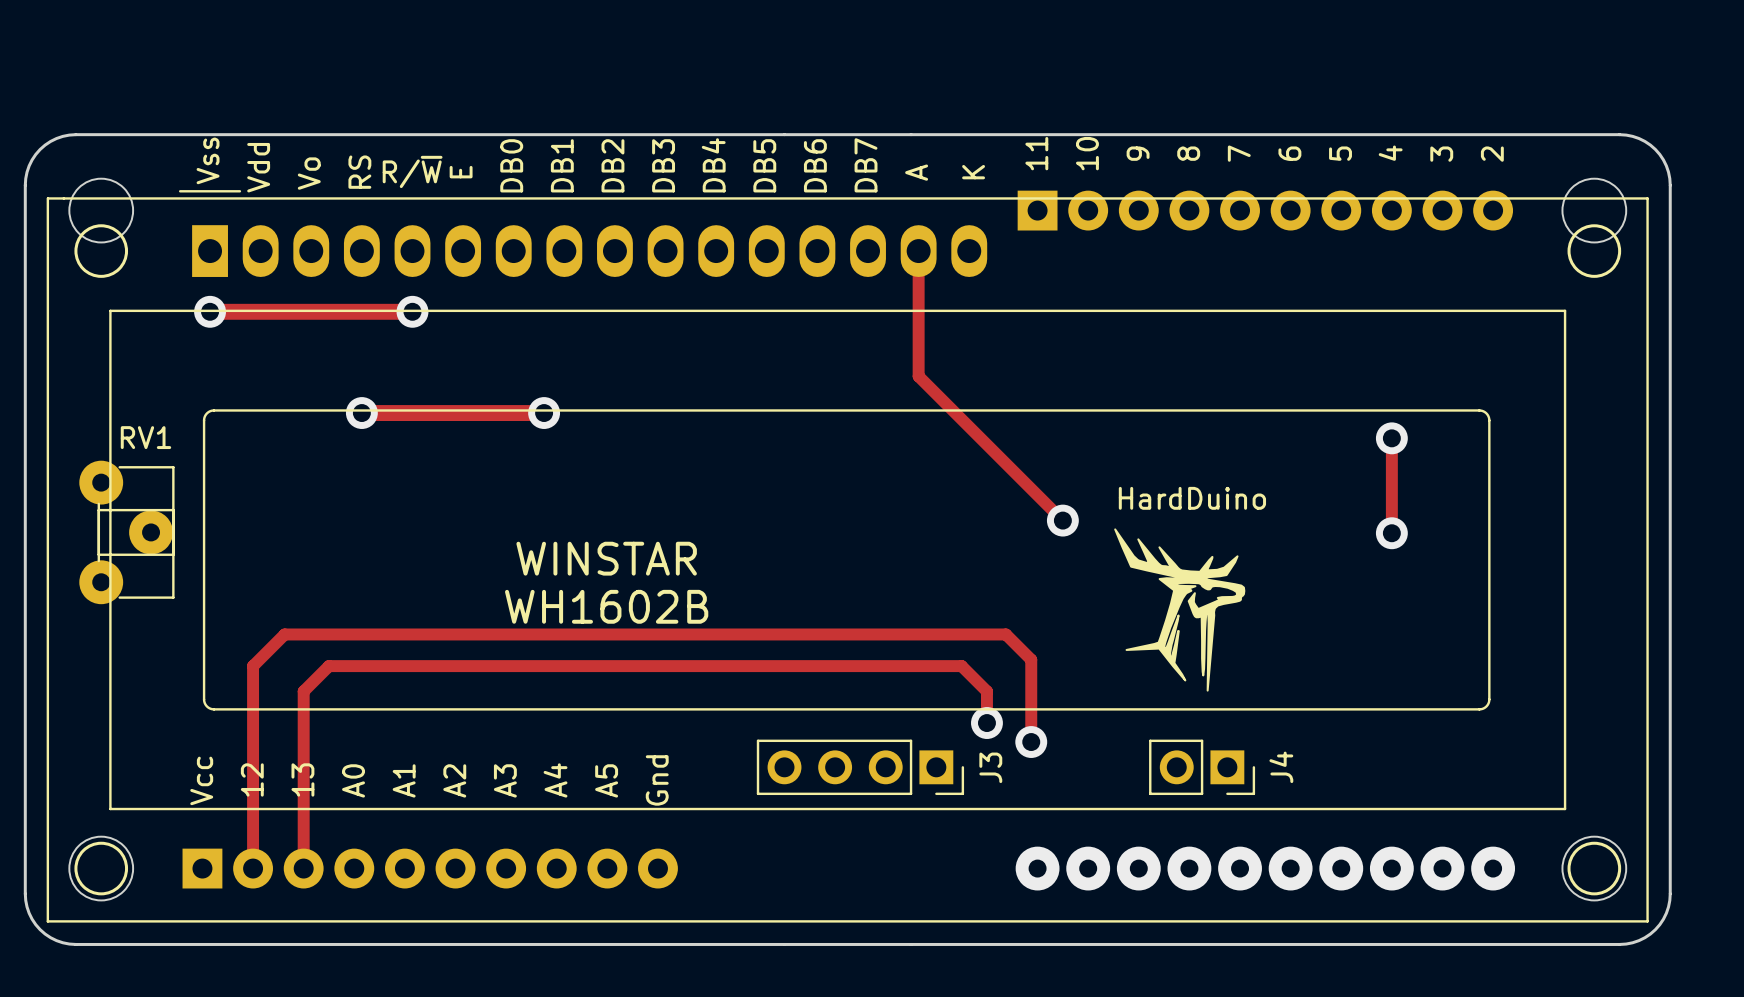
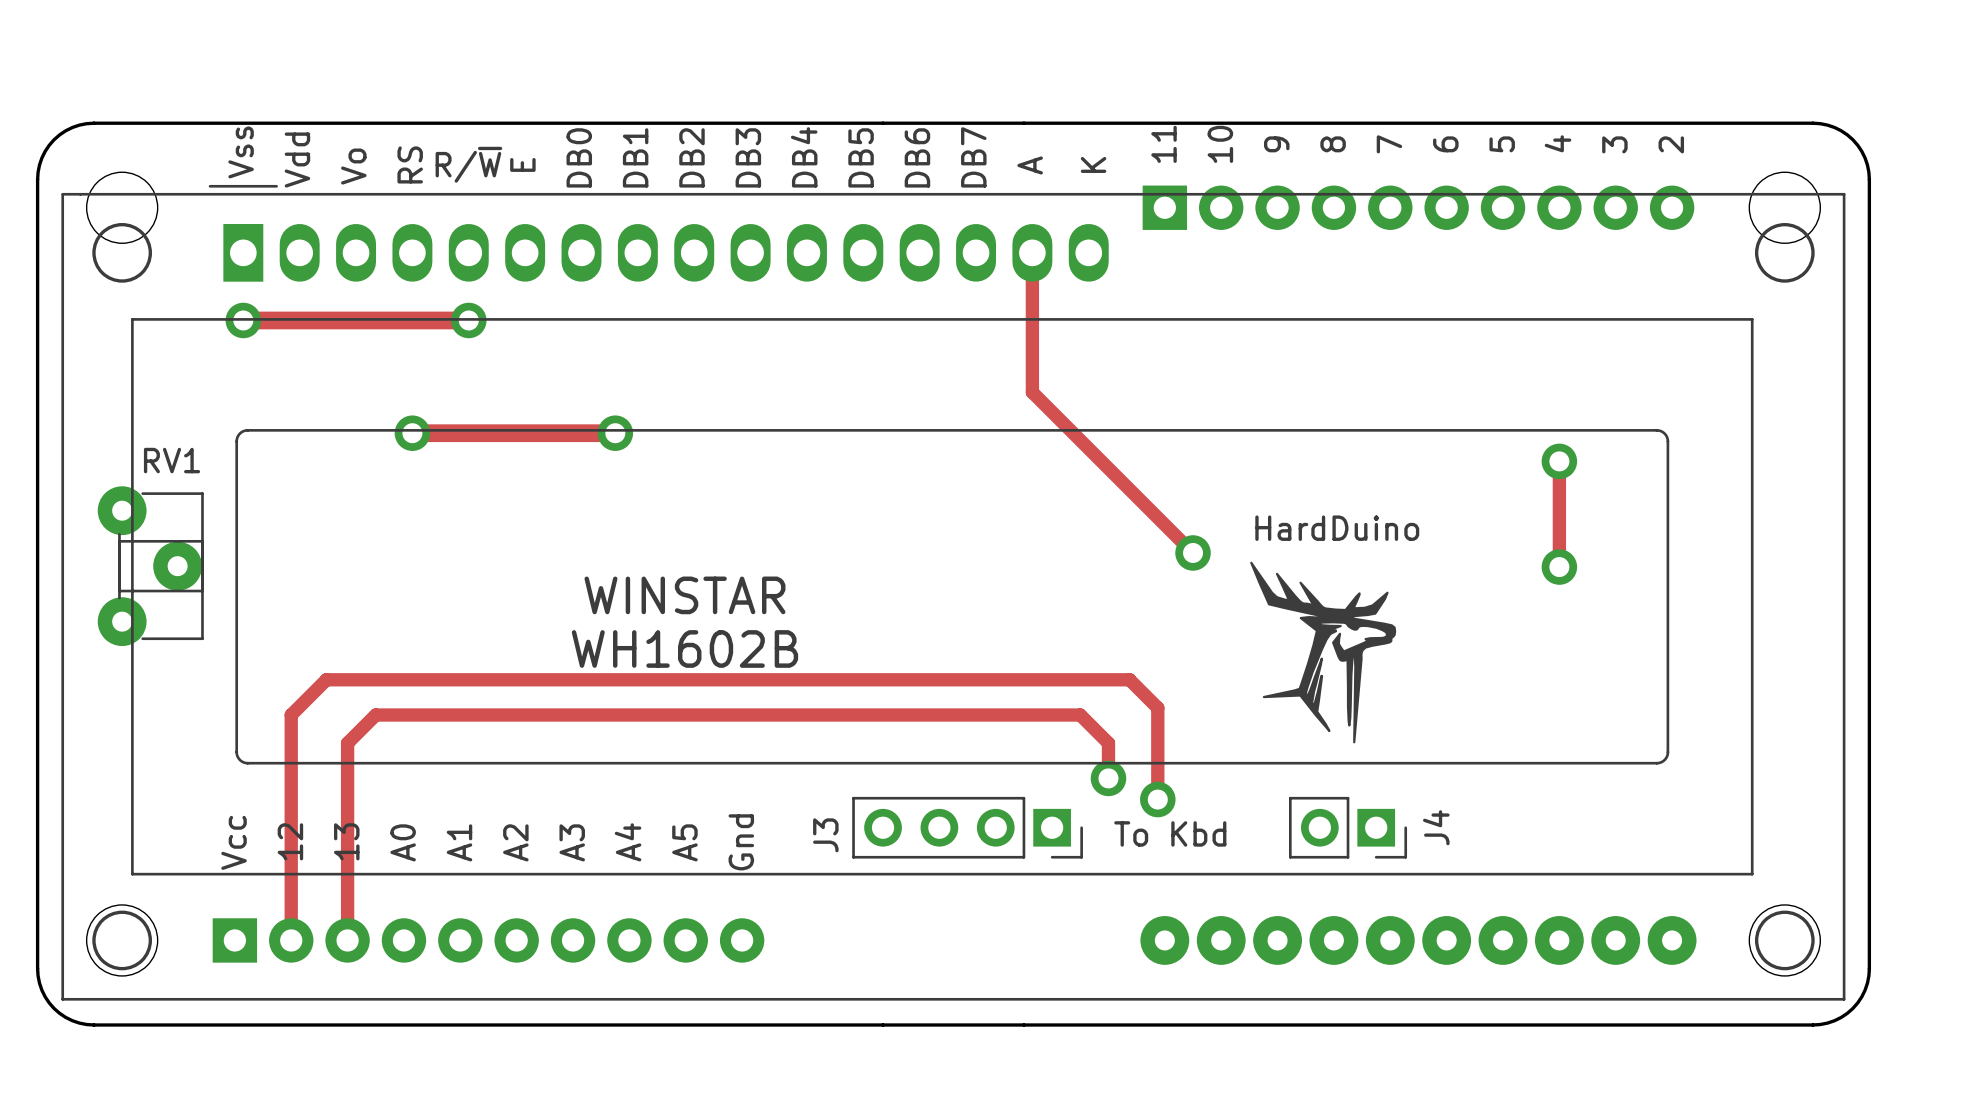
J3 name position: J3 (990, 767) -> J3 (825, 835)
text: none -> To Kbd (1170, 833)

